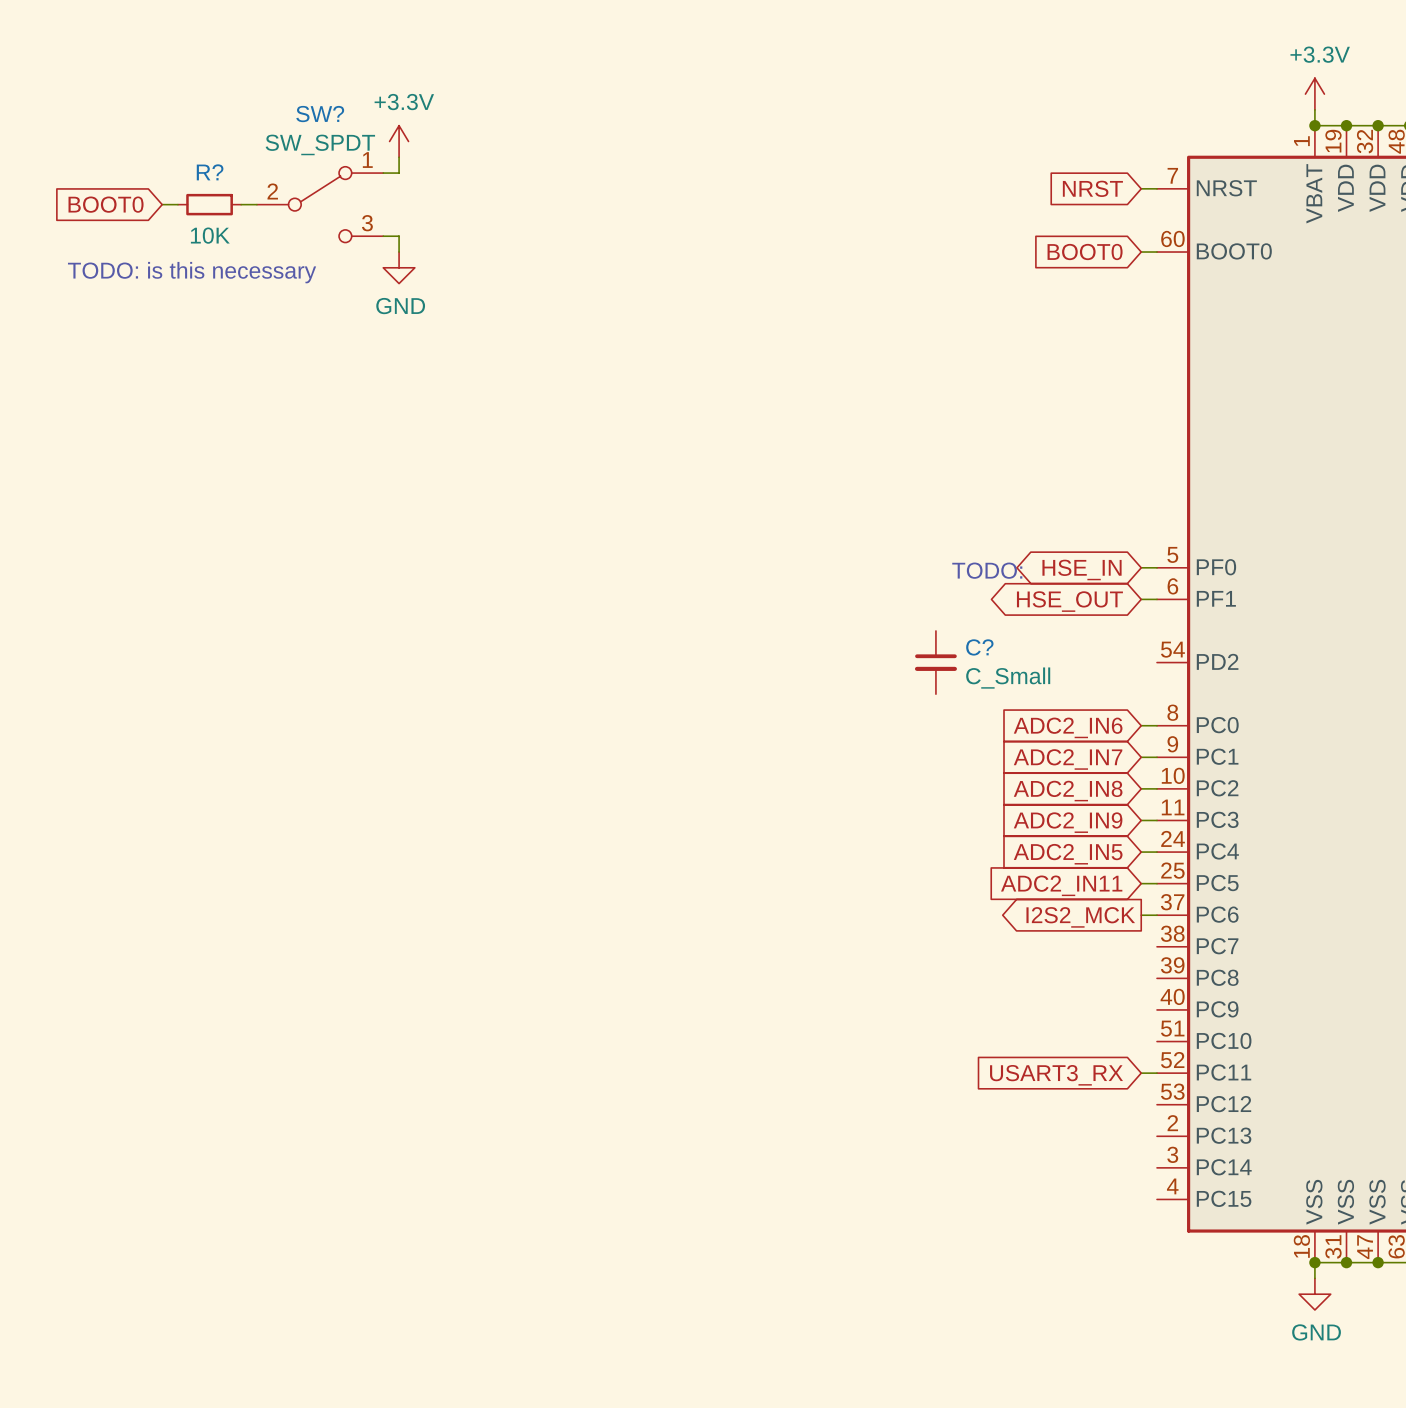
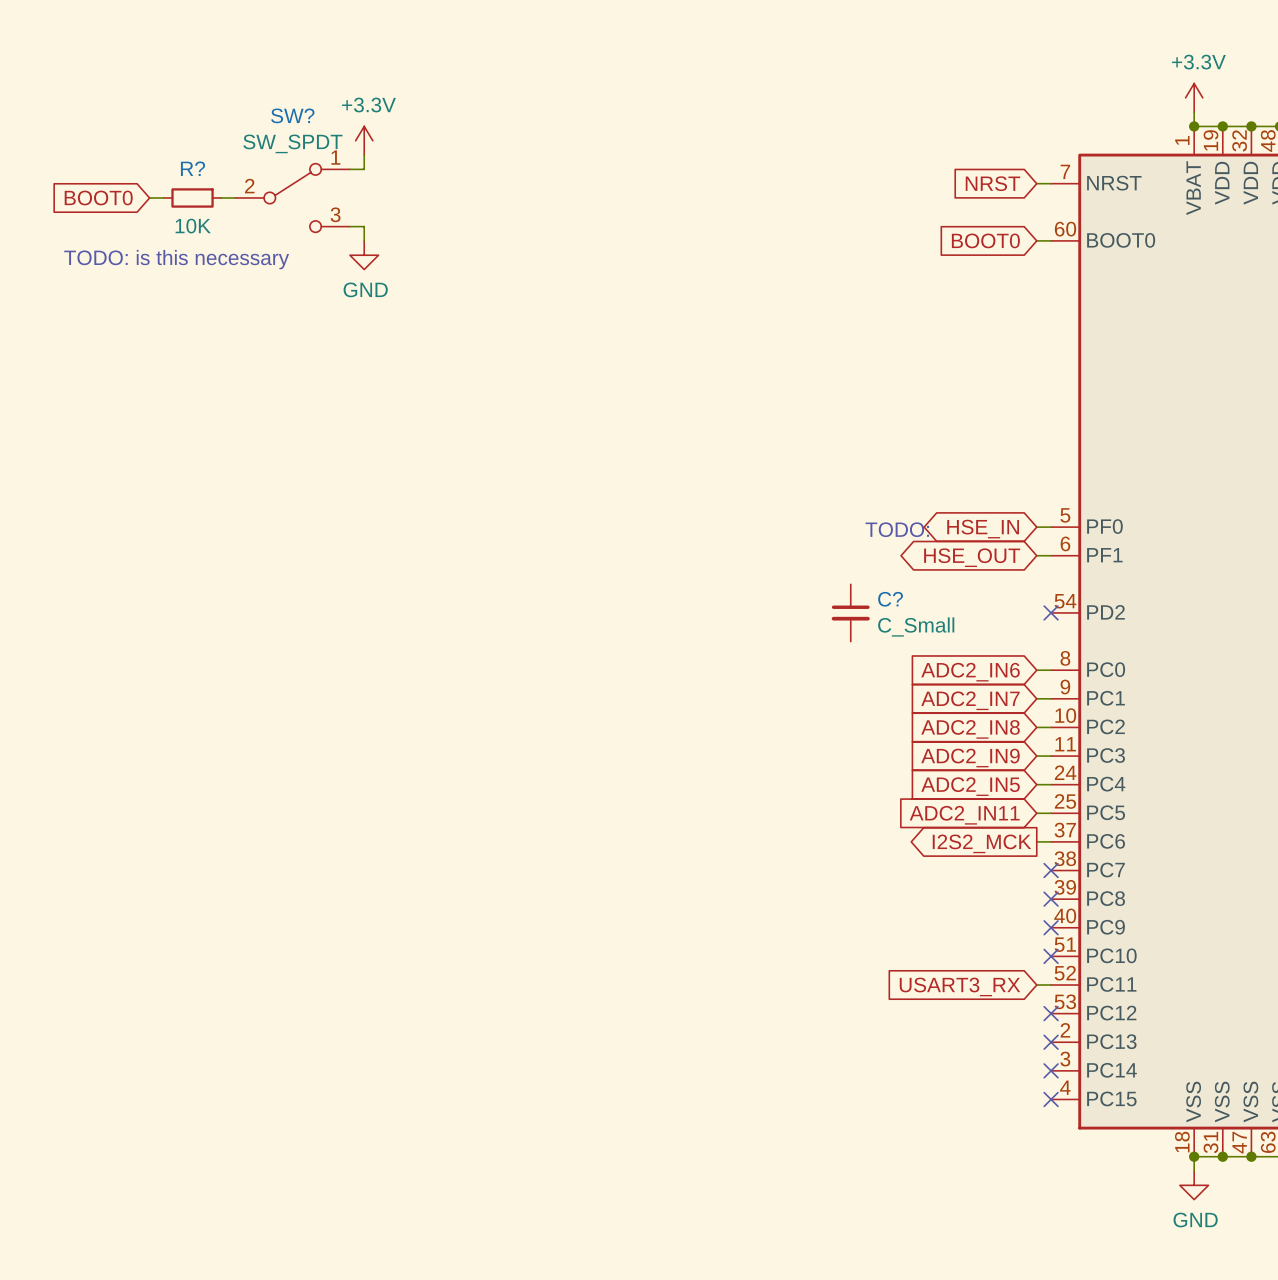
no-connect mark: none -> (1051, 612)
no-connect mark: none -> (1051, 870)
no-connect mark: none -> (1051, 899)
no-connect mark: none -> (1051, 927)
no-connect mark: none -> (1051, 956)
no-connect mark: none -> (1051, 1013)
no-connect mark: none -> (1051, 1042)
no-connect mark: none -> (1051, 1070)
no-connect mark: none -> (1051, 1099)

